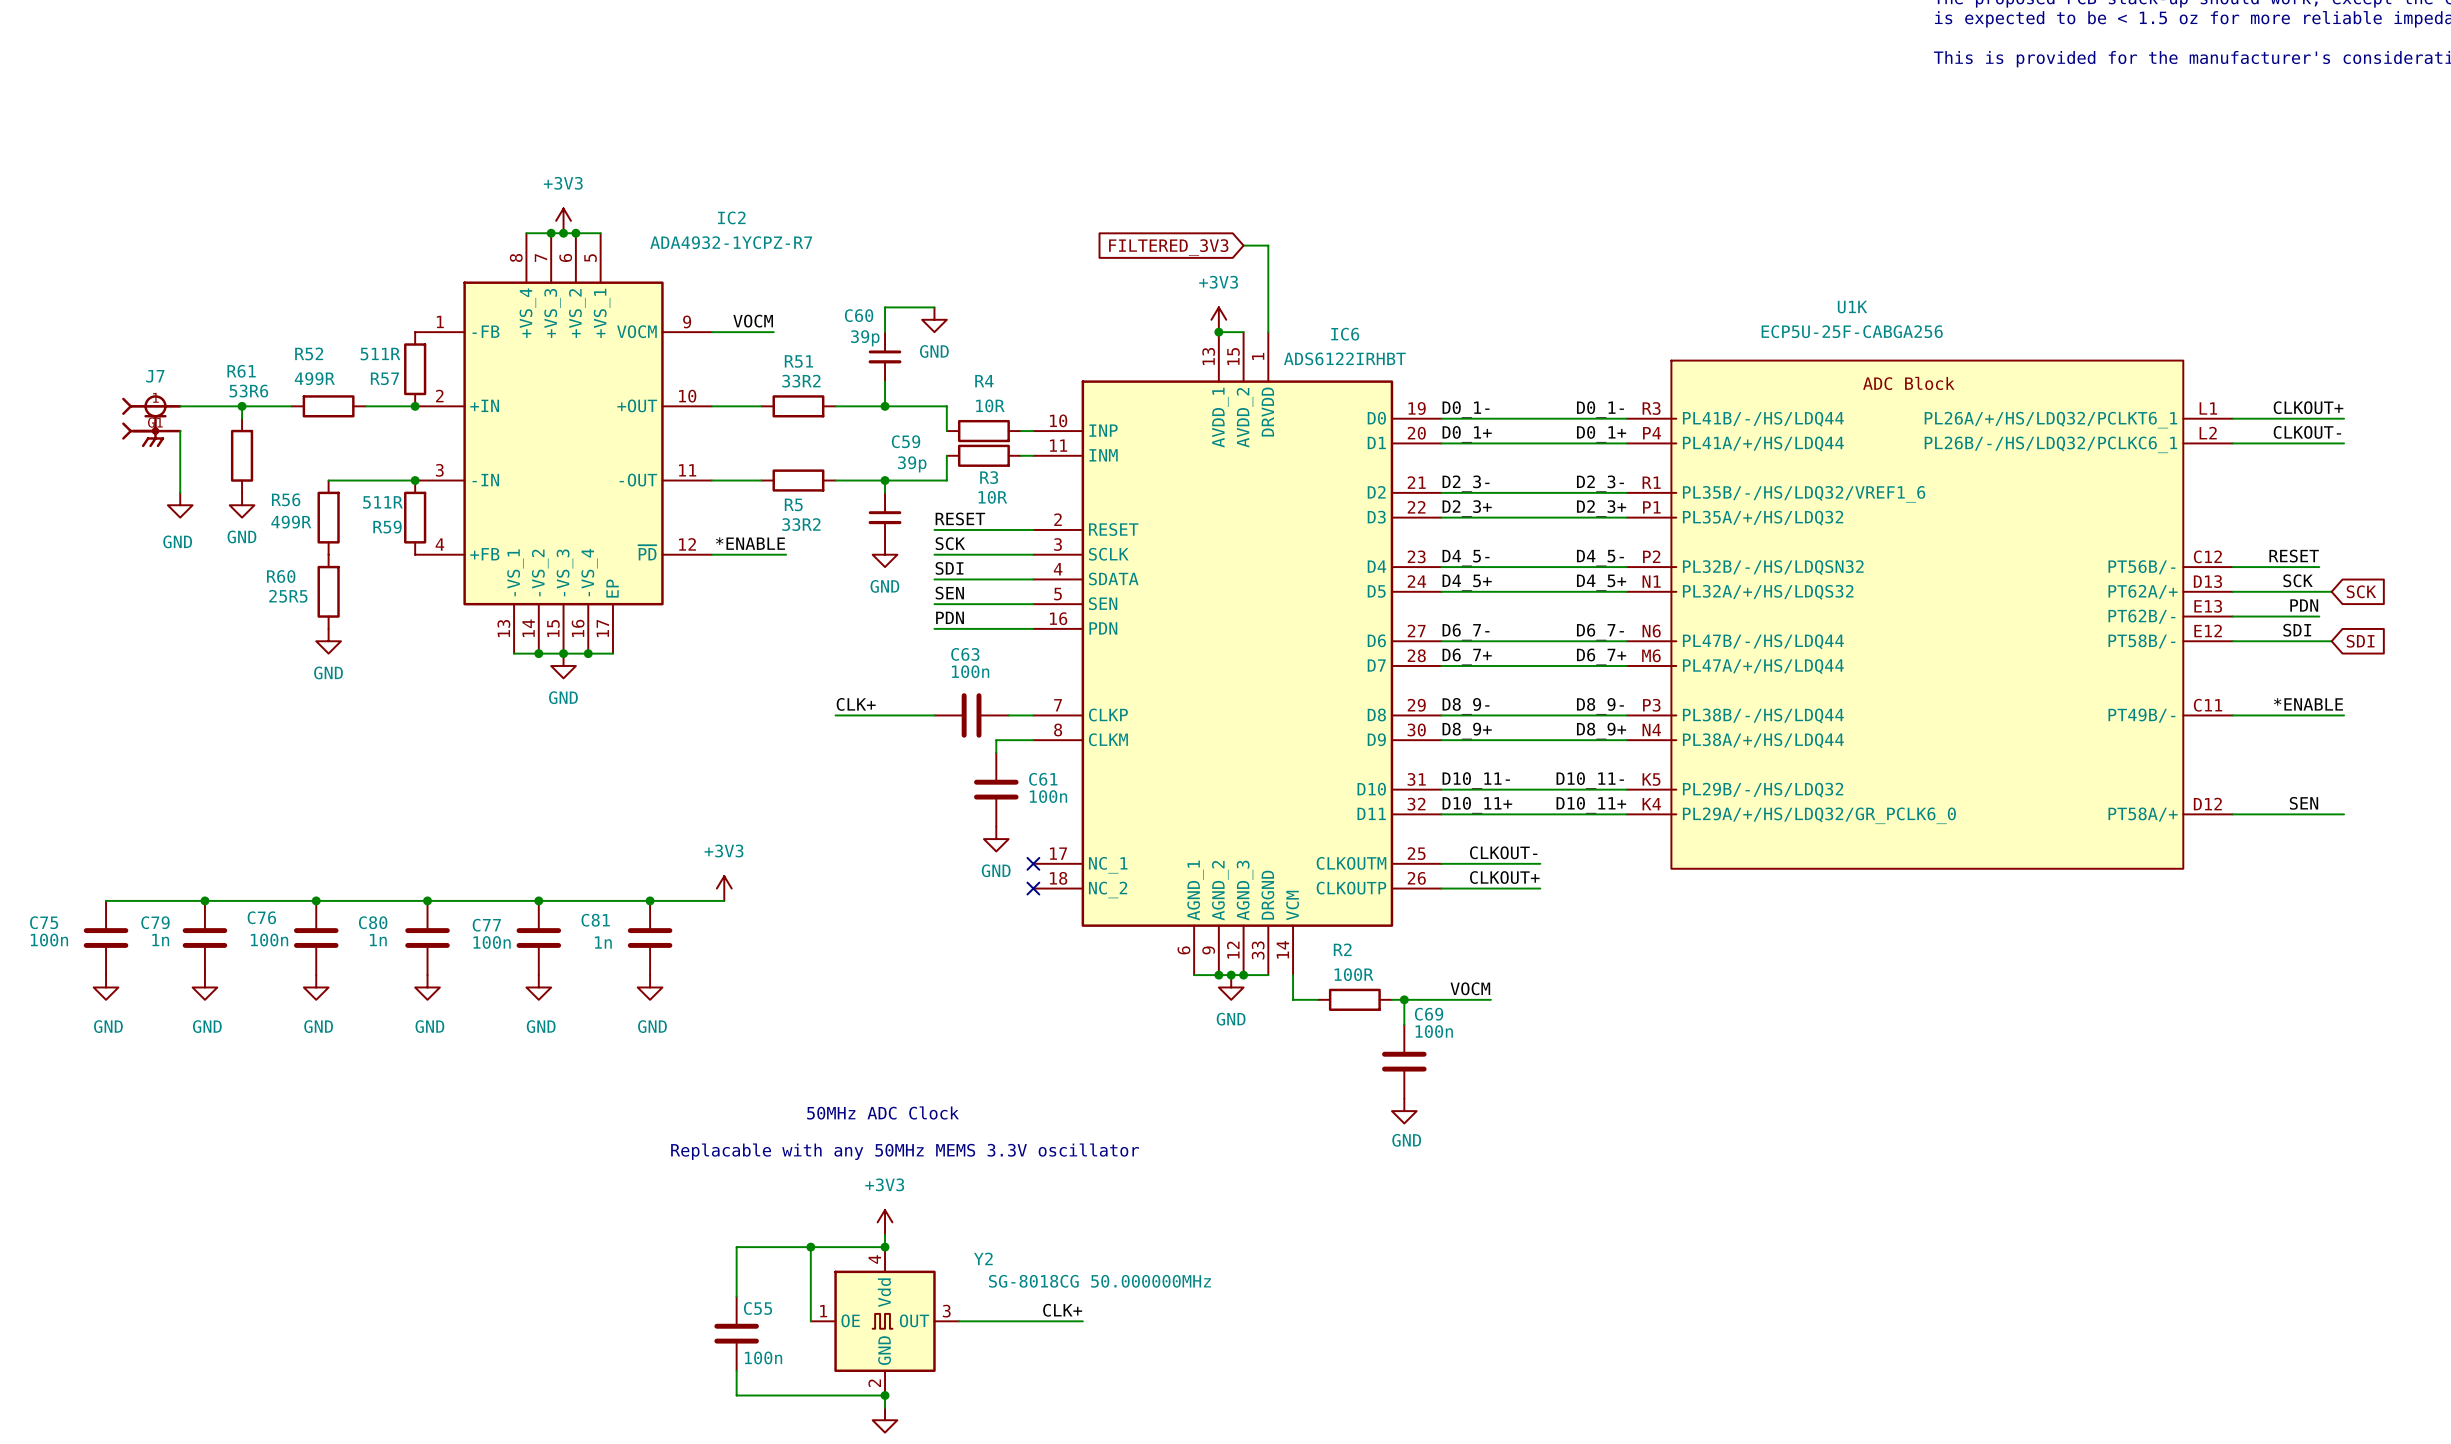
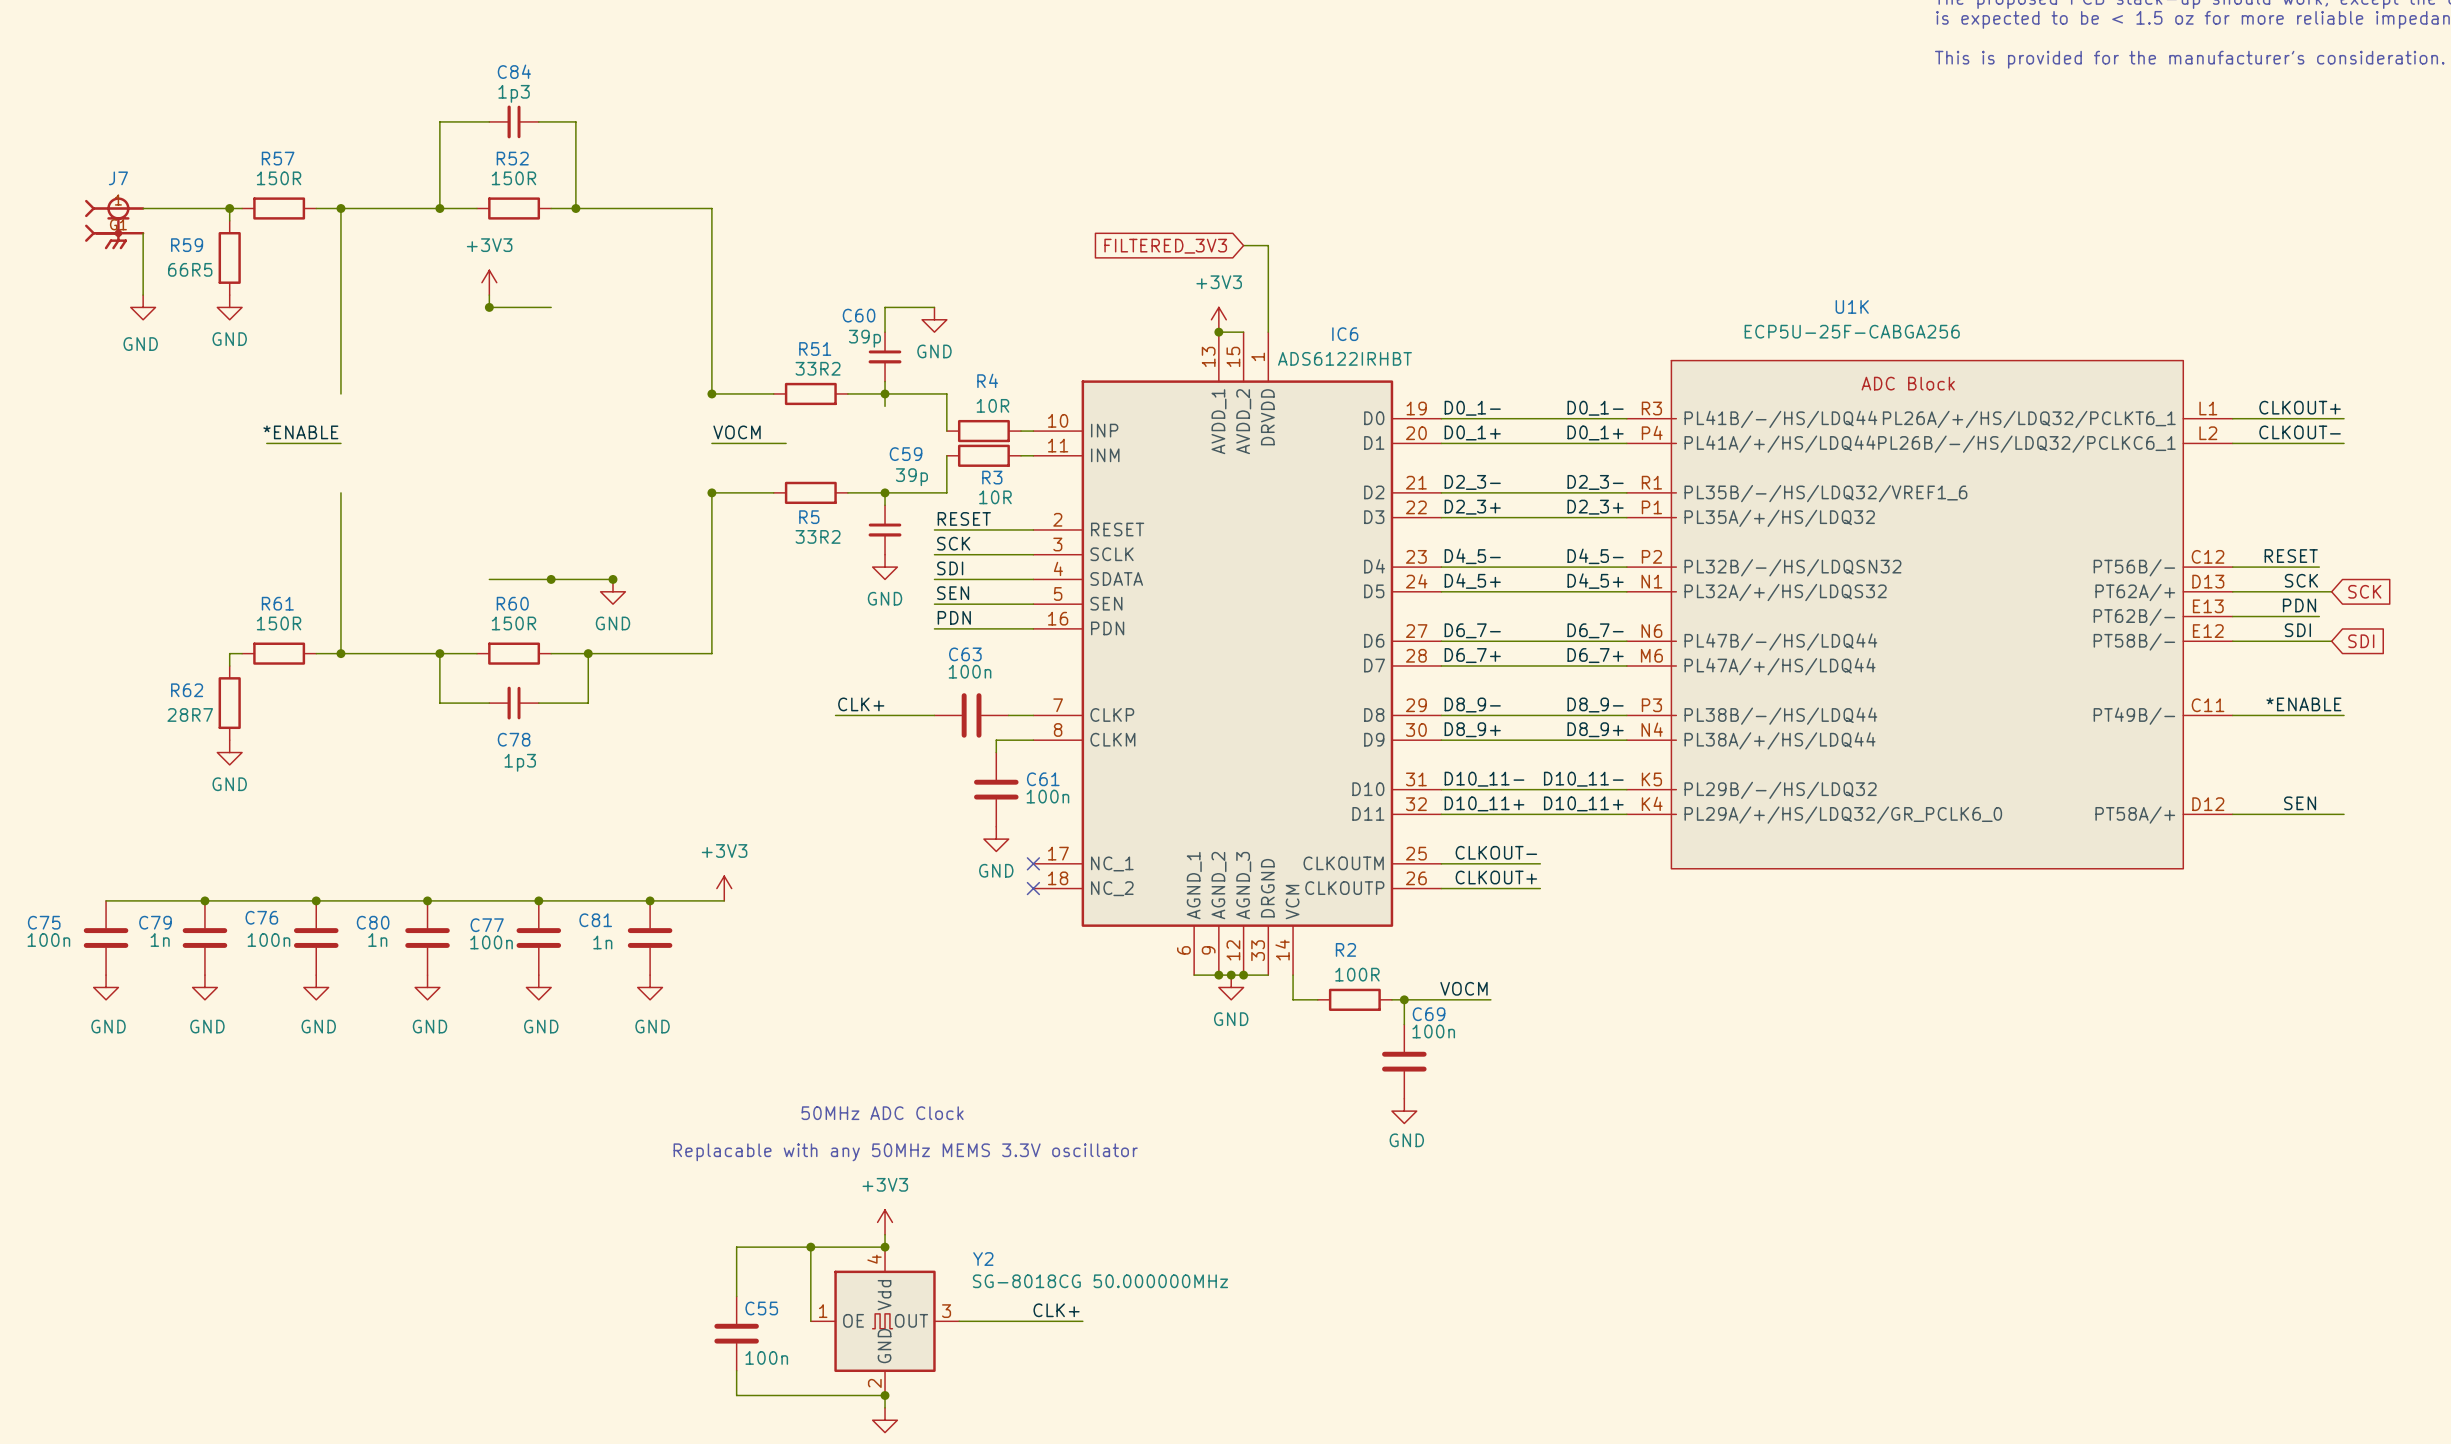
wire: none -> (489, 121) (439, 121) (439, 208)
C84: none -> 1p3 (514, 121)
wire: none -> (538, 121) (575, 121) (575, 208)
wire: none -> (143, 208) (242, 208)
junction: none -> (229, 208)
wire: none -> (316, 208) (476, 208)
wire: none -> (340, 208) (340, 393)
junction: none -> (340, 208)
junction: none -> (439, 208)
wire: none -> (551, 208) (711, 208) (711, 393) (773, 393)
junction: none -> (575, 208)
power symbol position: +3V3 (563, 220) -> +3V3 (489, 282)
wire: (526, 233) (600, 233) -> none
junction: (551, 233) -> none
junction: (563, 233) -> none
junction: (575, 233) -> none
power symbol: none -> GND (143, 307)
power symbol: none -> GND (229, 307)
junction: none -> (489, 307)
label position: VOCM (753, 321) -> VOCM (737, 432)
wire: (711, 332) (773, 332) -> none
R52 name position: R52 (309, 353) -> R52 (512, 158)
R57 value: 511R (380, 354) -> 150R (279, 178)
R57 rotation: 0° (415, 369) -> 90° clockwise (279, 208)
R57 position: (415, 369) -> (279, 208)
R61 name position: R61 (241, 371) -> R61 (277, 603)
R52 value: 499R (314, 378) -> 150R (513, 178)
R61 value: 53R6 (248, 391) -> 150R (279, 623)
junction: none -> (711, 393)
wire: (180, 406) (291, 406) -> none
wire: (242, 406) (242, 418) -> (229, 208) (229, 220)
junction: (242, 406) -> none
R52 position: (328, 406) -> (514, 208)
wire: (365, 406) (415, 406) -> none
junction: (415, 406) -> none
wire: (711, 406) (761, 406) -> none
R51 position: (798, 406) -> (810, 393)
wire: (835, 406) (946, 406) -> (847, 393) (946, 393) (946, 406)
junction position: (885, 406) -> (885, 393)
J7 position: (151, 421) -> (114, 223)
wire: (180, 431) (180, 492) -> (143, 233) (143, 295)
label: none -> *ENABLE (300, 432)
wire: none -> (266, 443) (340, 443)
IC2: ADA4932-1YCPZ-R7 (563, 443) -> none
R61 rotation: 0° (242, 455) -> 90° clockwise (279, 653)
R61 position: (242, 455) -> (279, 653)
wire: (328, 480) (415, 480) -> none
junction: (415, 480) -> none
wire: (711, 480) (761, 480) -> none
R5 position: (798, 480) -> (810, 492)
wire: (835, 480) (946, 480) -> (847, 492) (946, 492) (946, 480)
junction position: (885, 480) -> (885, 492)
wire: none -> (340, 492) (340, 653)
junction: none -> (711, 492)
wire: none -> (773, 492) (711, 492) (711, 653) (612, 653)
R59 value: 511R (382, 502) -> 66R5 (190, 269)
power symbol: GND (180, 505) -> none
power symbol: GND (242, 505) -> none
R56: 499R (328, 517) -> none
R59 position: (415, 517) -> (229, 257)
C59 position: (885, 517) -> (885, 529)
R59 name position: R59 (387, 527) -> R59 (187, 245)
label: *ENABLE (750, 543) -> none
wire: (711, 554) (786, 554) -> (711, 443) (786, 443)
power symbol position: GND (885, 554) -> GND (885, 567)
R60 name position: R60 (281, 576) -> R60 (512, 603)
junction: none -> (551, 579)
junction: none -> (612, 579)
R60 rotation: 0° (328, 591) -> 90° clockwise (514, 653)
R60 position: (328, 591) -> (514, 653)
R60 value: 25R5 (288, 596) -> 150R (513, 623)
power symbol: GND (328, 641) -> none
wire: none -> (242, 653) (229, 653) (229, 665)
wire: none -> (316, 653) (476, 653)
junction: none -> (340, 653)
wire: none -> (439, 653) (439, 703) (489, 703)
junction: none -> (439, 653)
wire: (514, 653) (551, 653) -> none
junction: (538, 653) -> none
junction: (563, 653) -> none
wire: none -> (588, 653) (588, 703) (538, 703)
power symbol position: GND (563, 665) -> GND (612, 591)
R62: none -> 28R7 (229, 703)
C78: none -> 1p3 (514, 703)
power symbol: none -> GND (229, 752)

